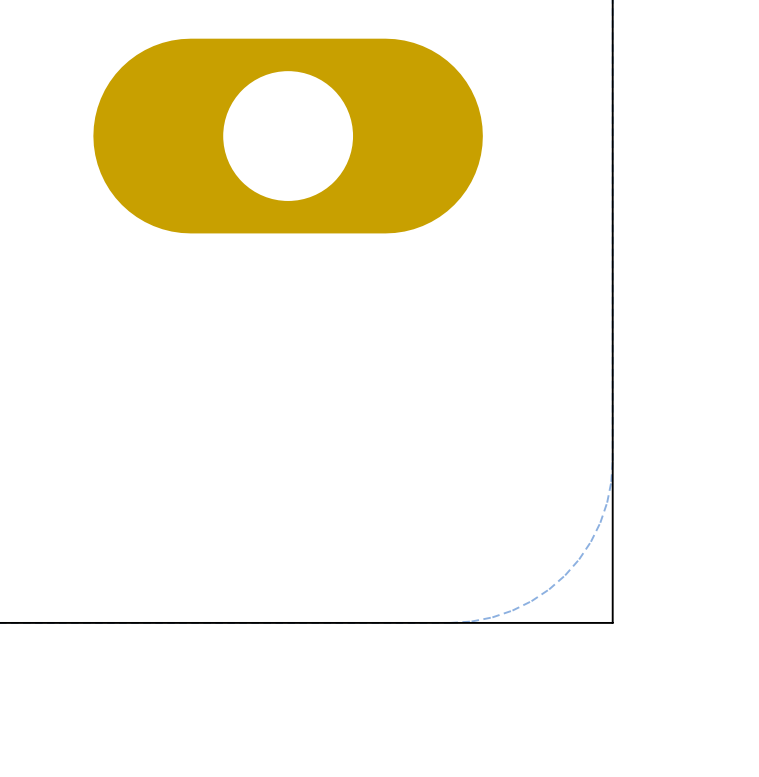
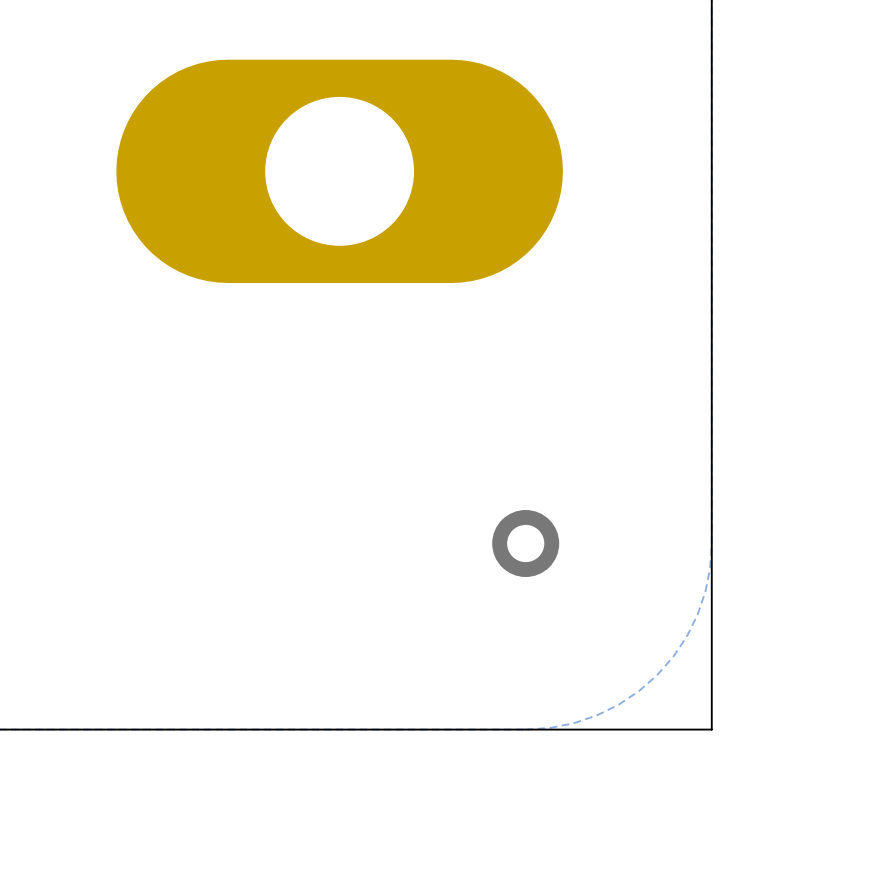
via: none -> (525, 543)

